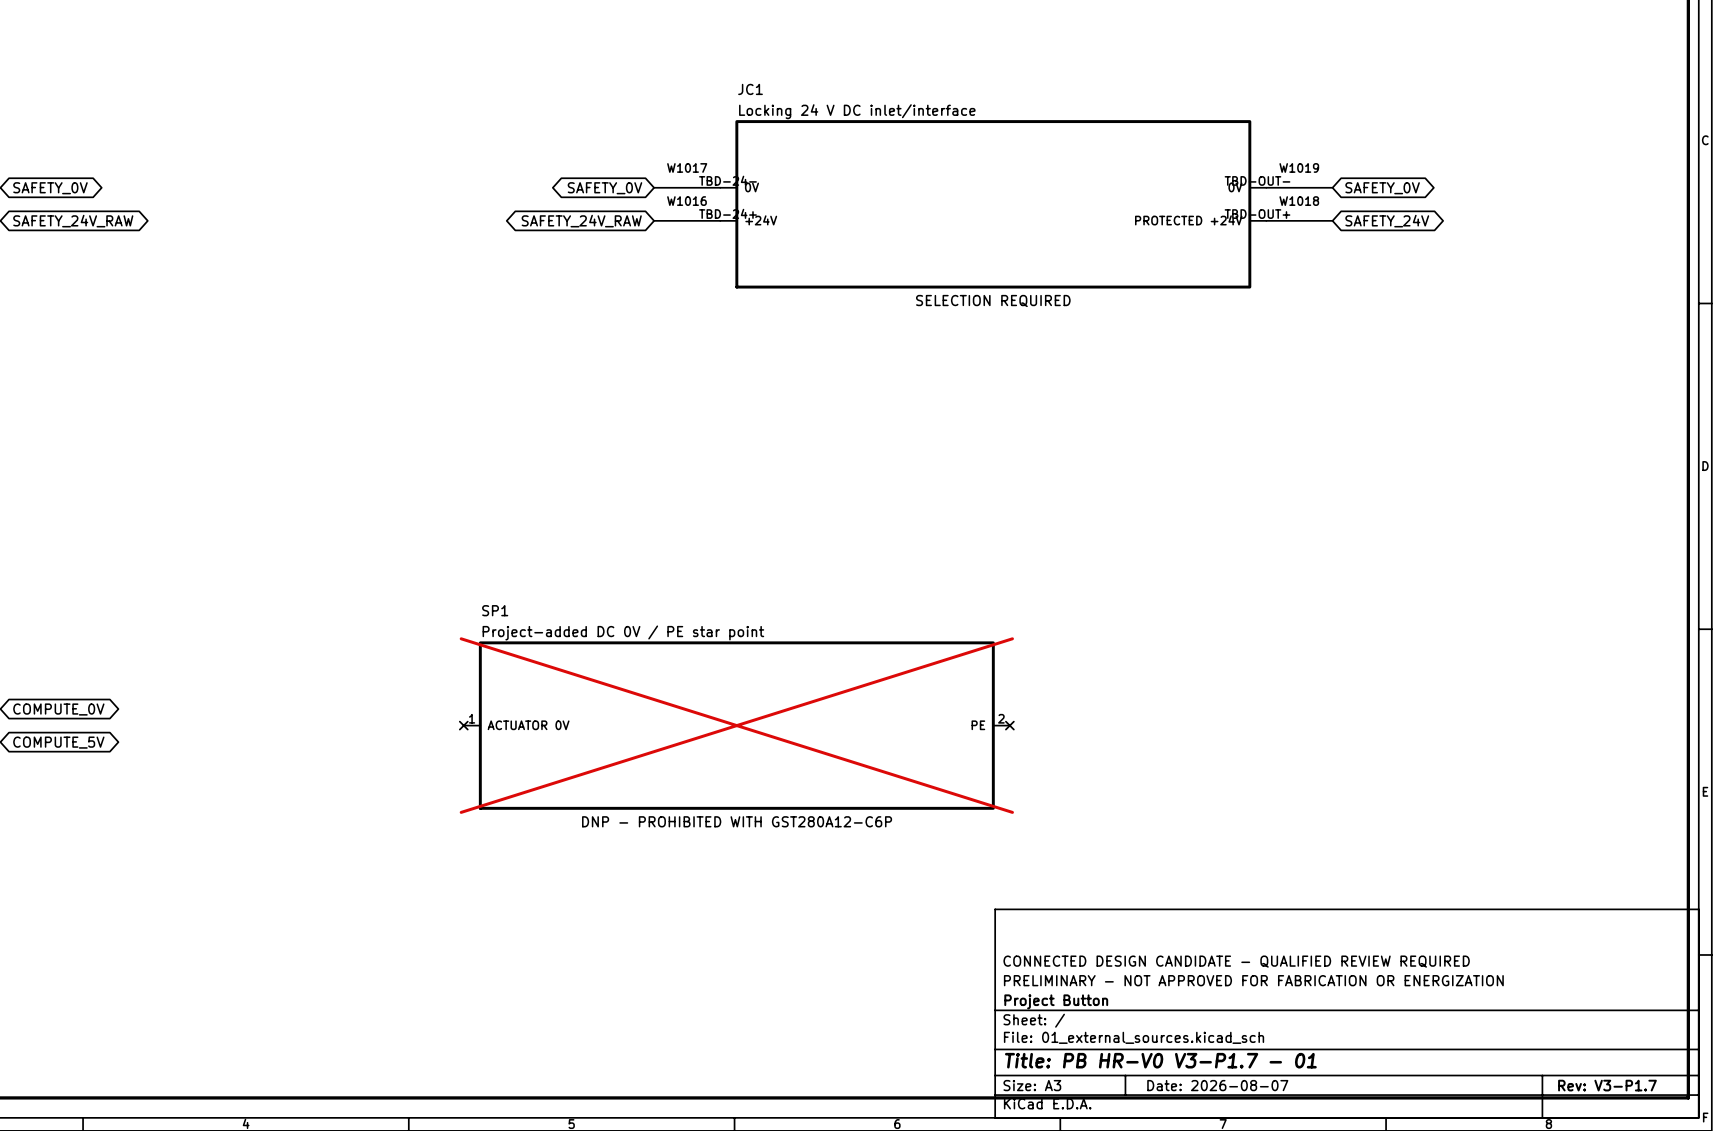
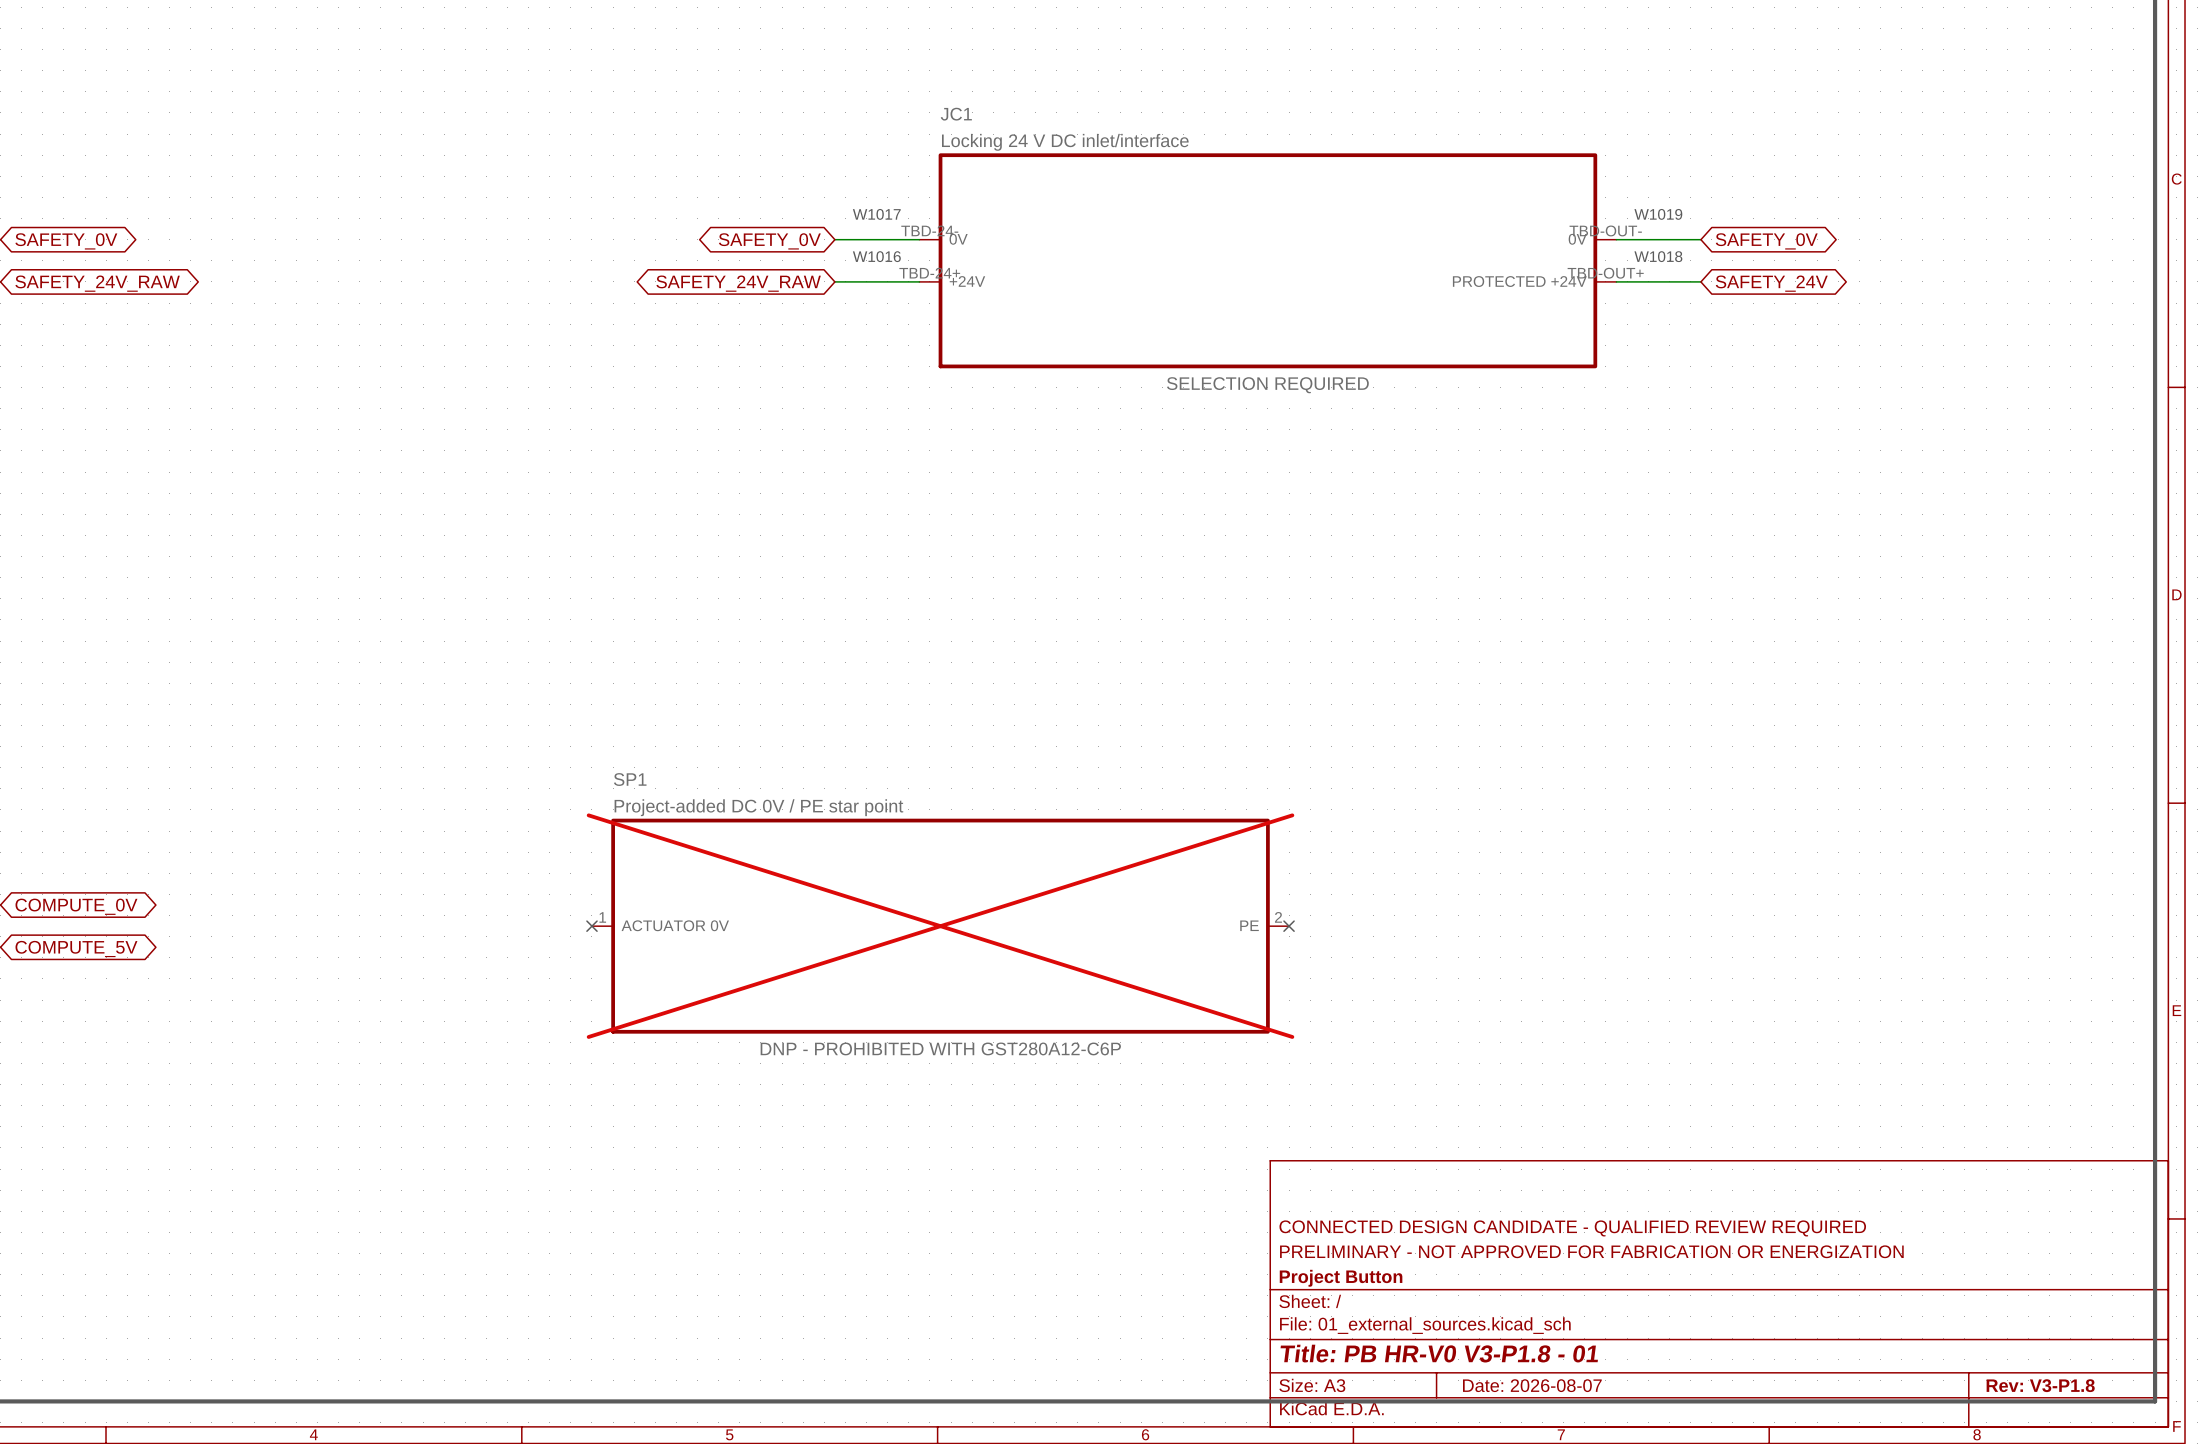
title block: Title: PB HR-V0 V3-P1.7 - 01 (1160, 1060) -> Title: PB HR-V0 V3-P1.8 - 01 (1439, 1353)
title block: Rev: V3-P1.7 (1607, 1085) -> Rev: V3-P1.8 (2040, 1385)

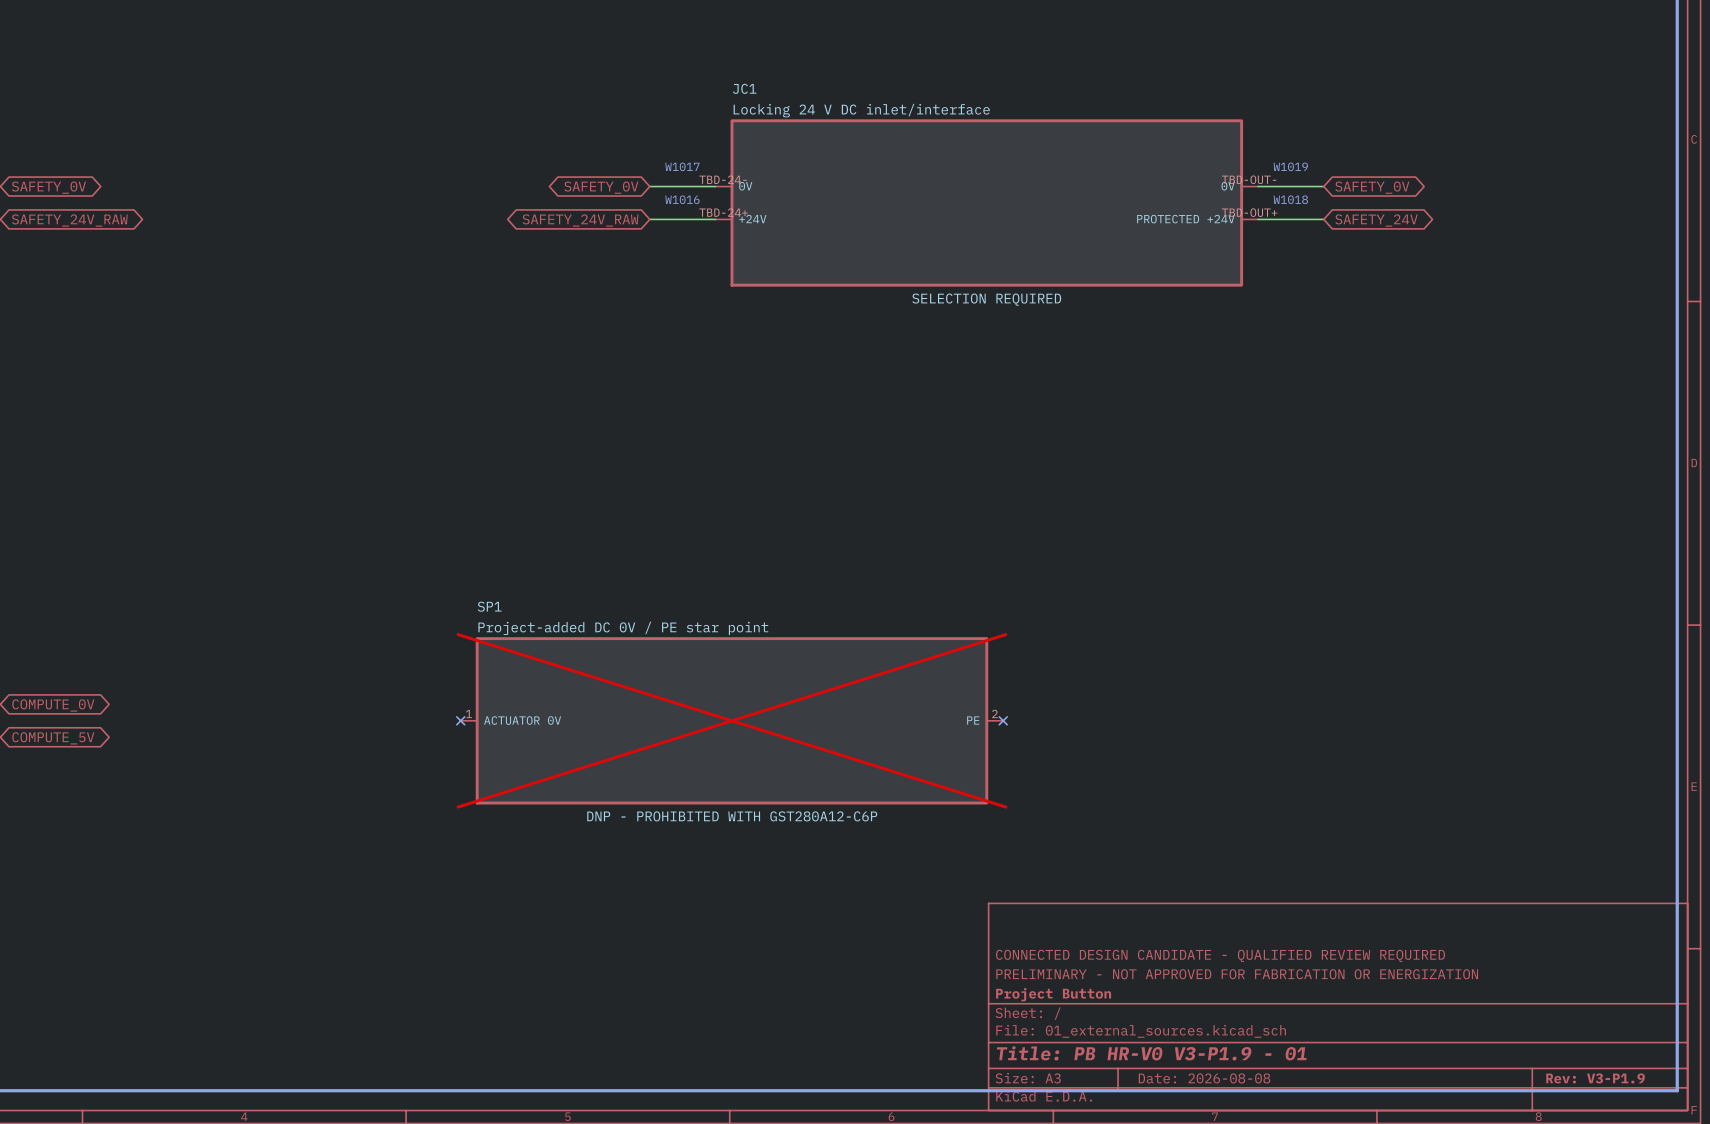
title block: Title: PB HR-V0 V3-P1.8 - 01 (1439, 1353) -> Title: PB HR-V0 V3-P1.9 - 01 (1151, 1053)
title block: Date: 2026-08-07 (1532, 1385) -> Date: 2026-08-08 (1204, 1078)
title block: Rev: V3-P1.8 (2040, 1385) -> Rev: V3-P1.9 (1595, 1078)

